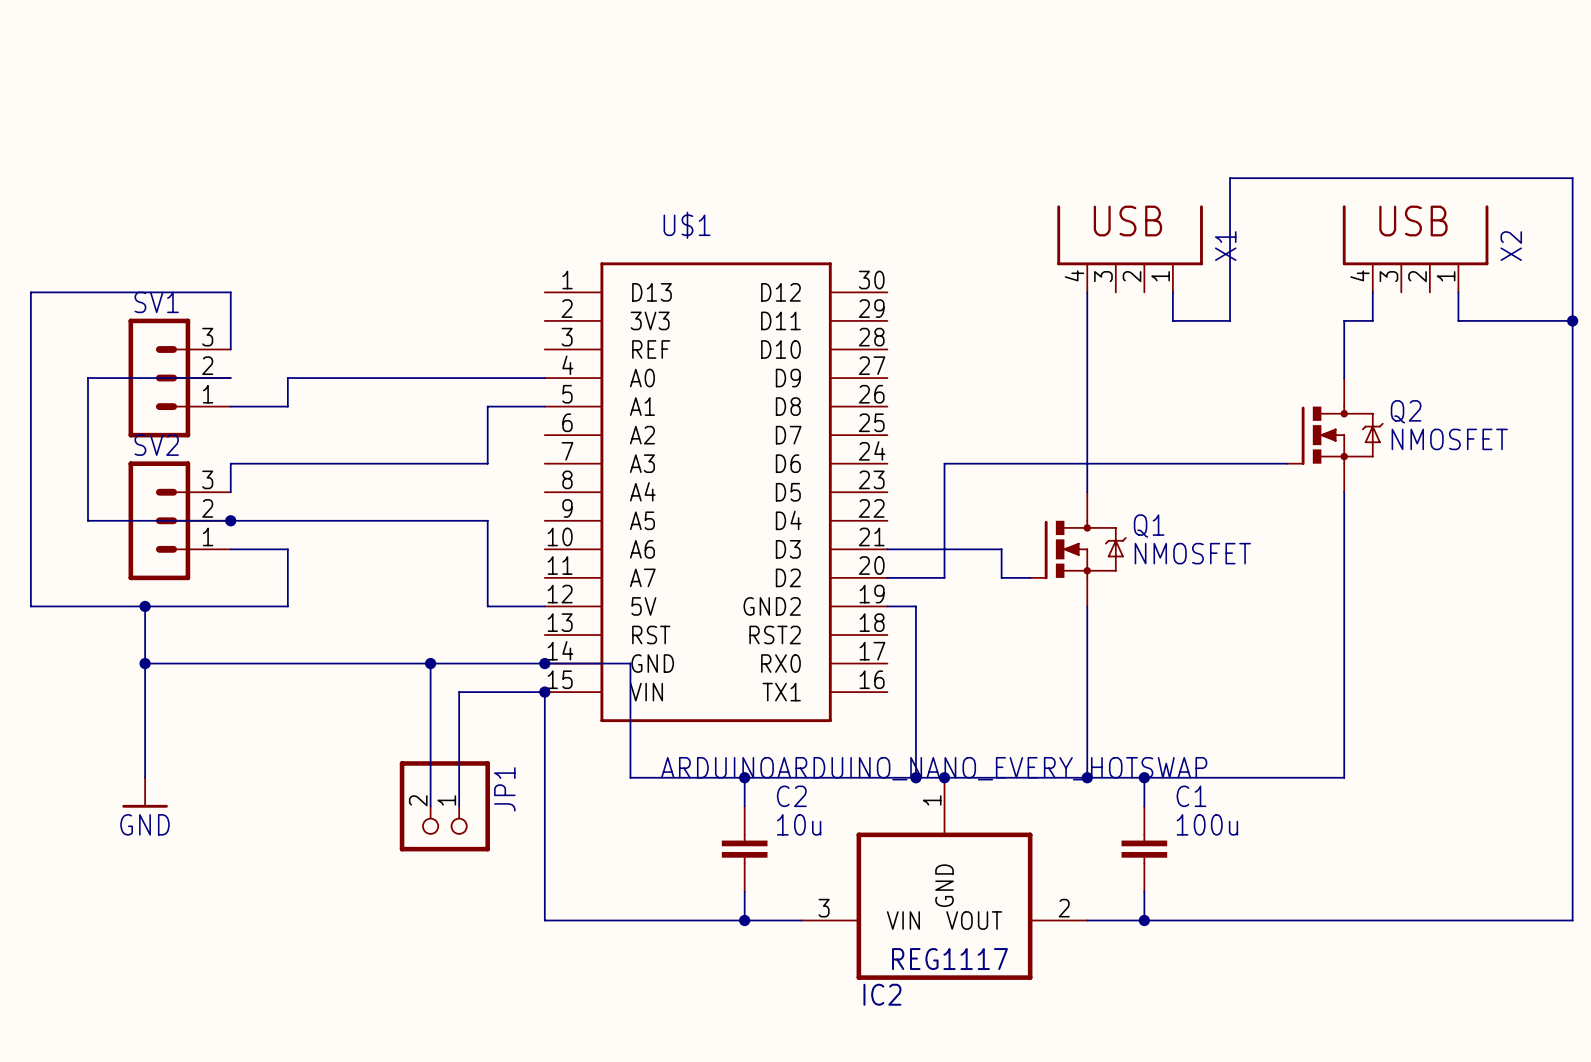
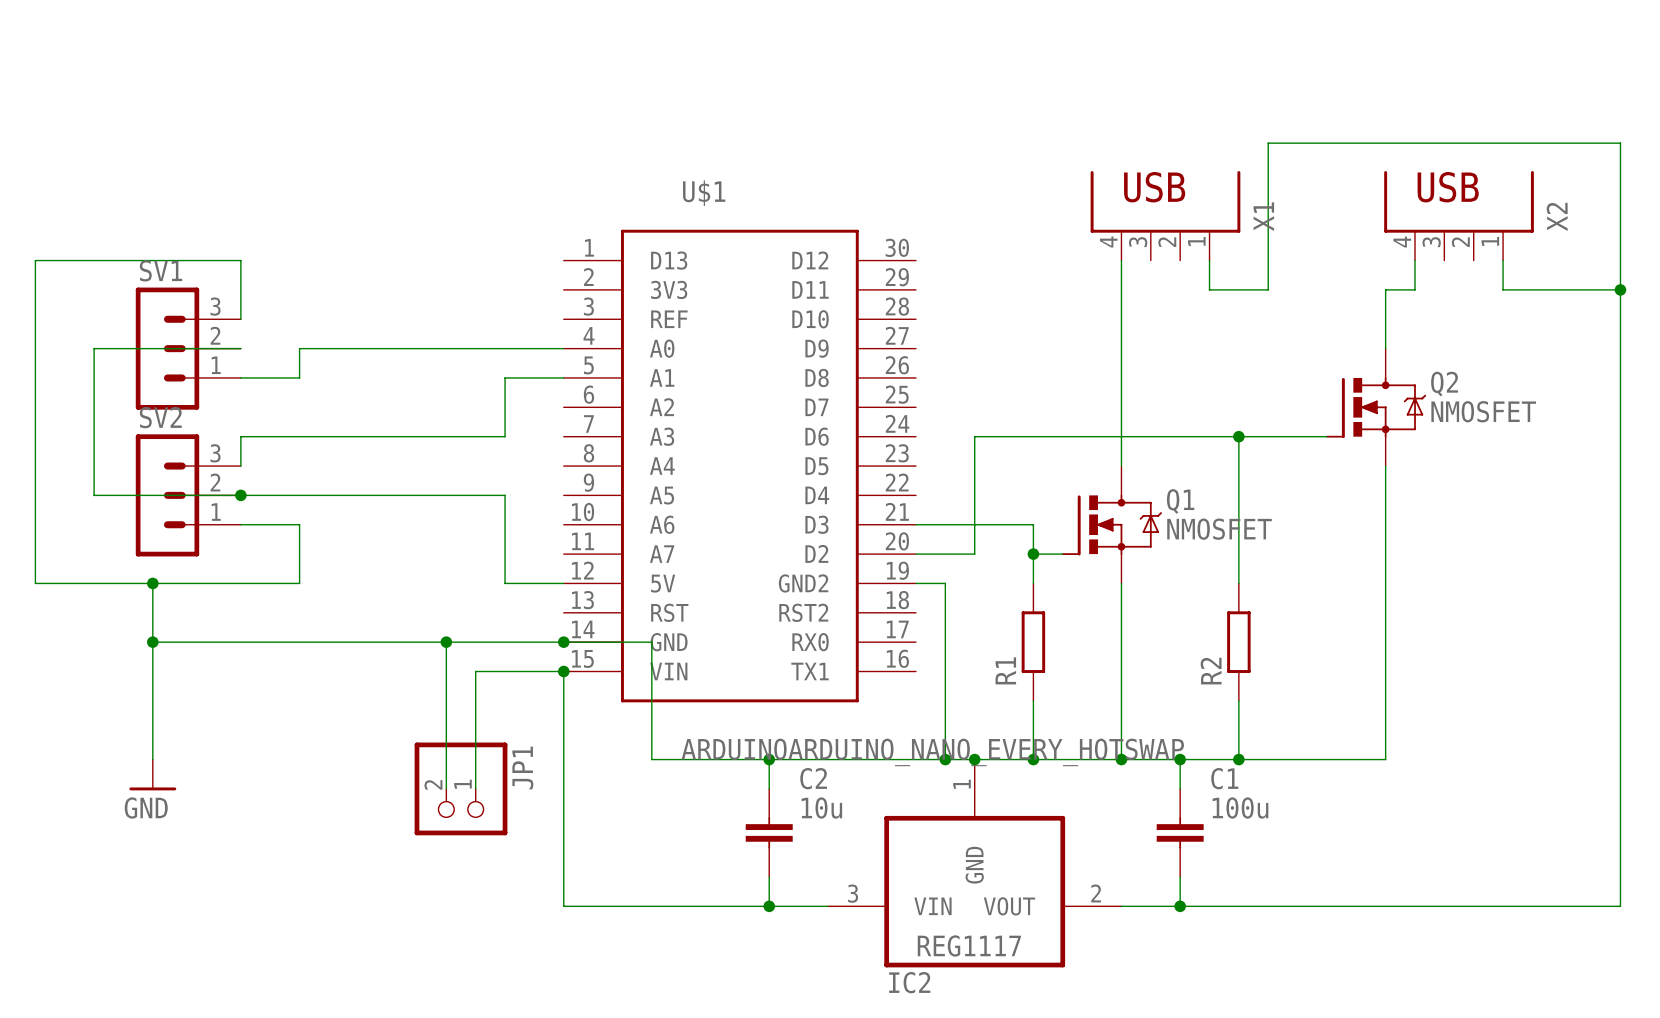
wire: none -> (1238, 436) (1238, 583)
junction: none -> (1238, 436)
wire: none -> (1033, 554) (1033, 583)
junction: none -> (1033, 554)
R1: none -> (1033, 642)
R2: none -> (1238, 642)
wire: none -> (1033, 700) (1033, 759)
wire: none -> (1238, 700) (1238, 759)
junction: none -> (1033, 759)
junction: none -> (1238, 759)

